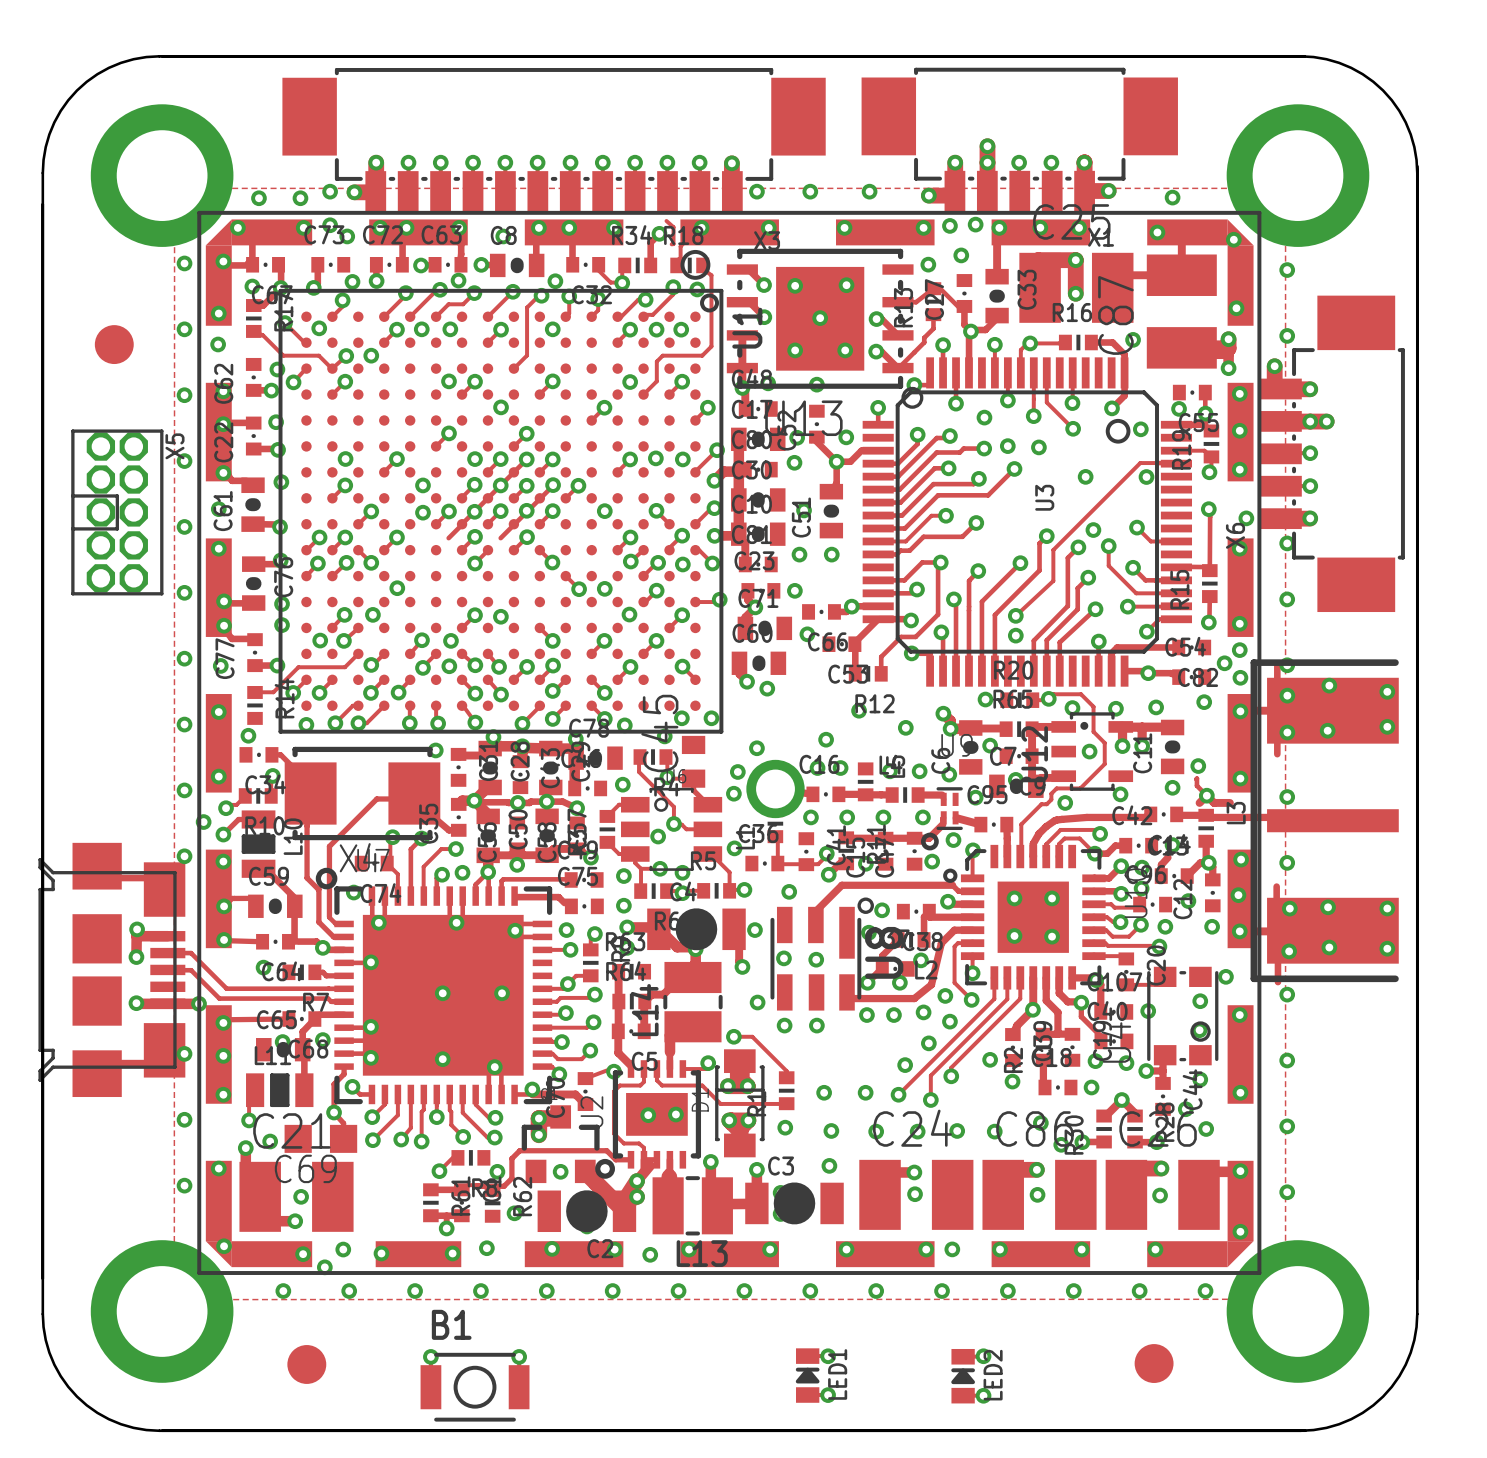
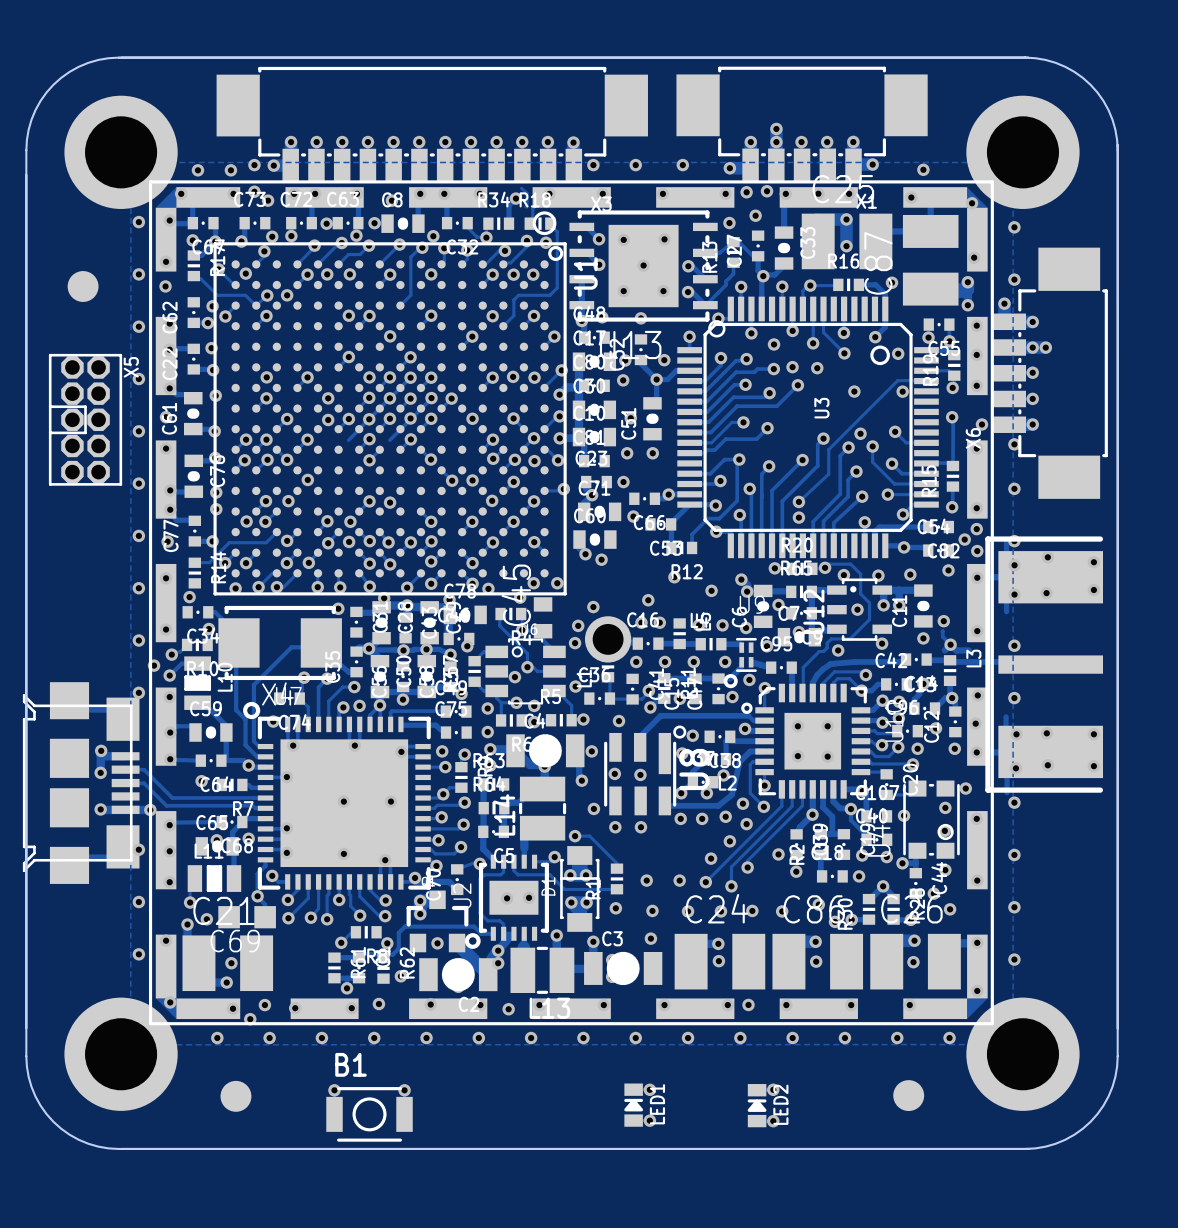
via position: (622, 784) -> (467, 646)

